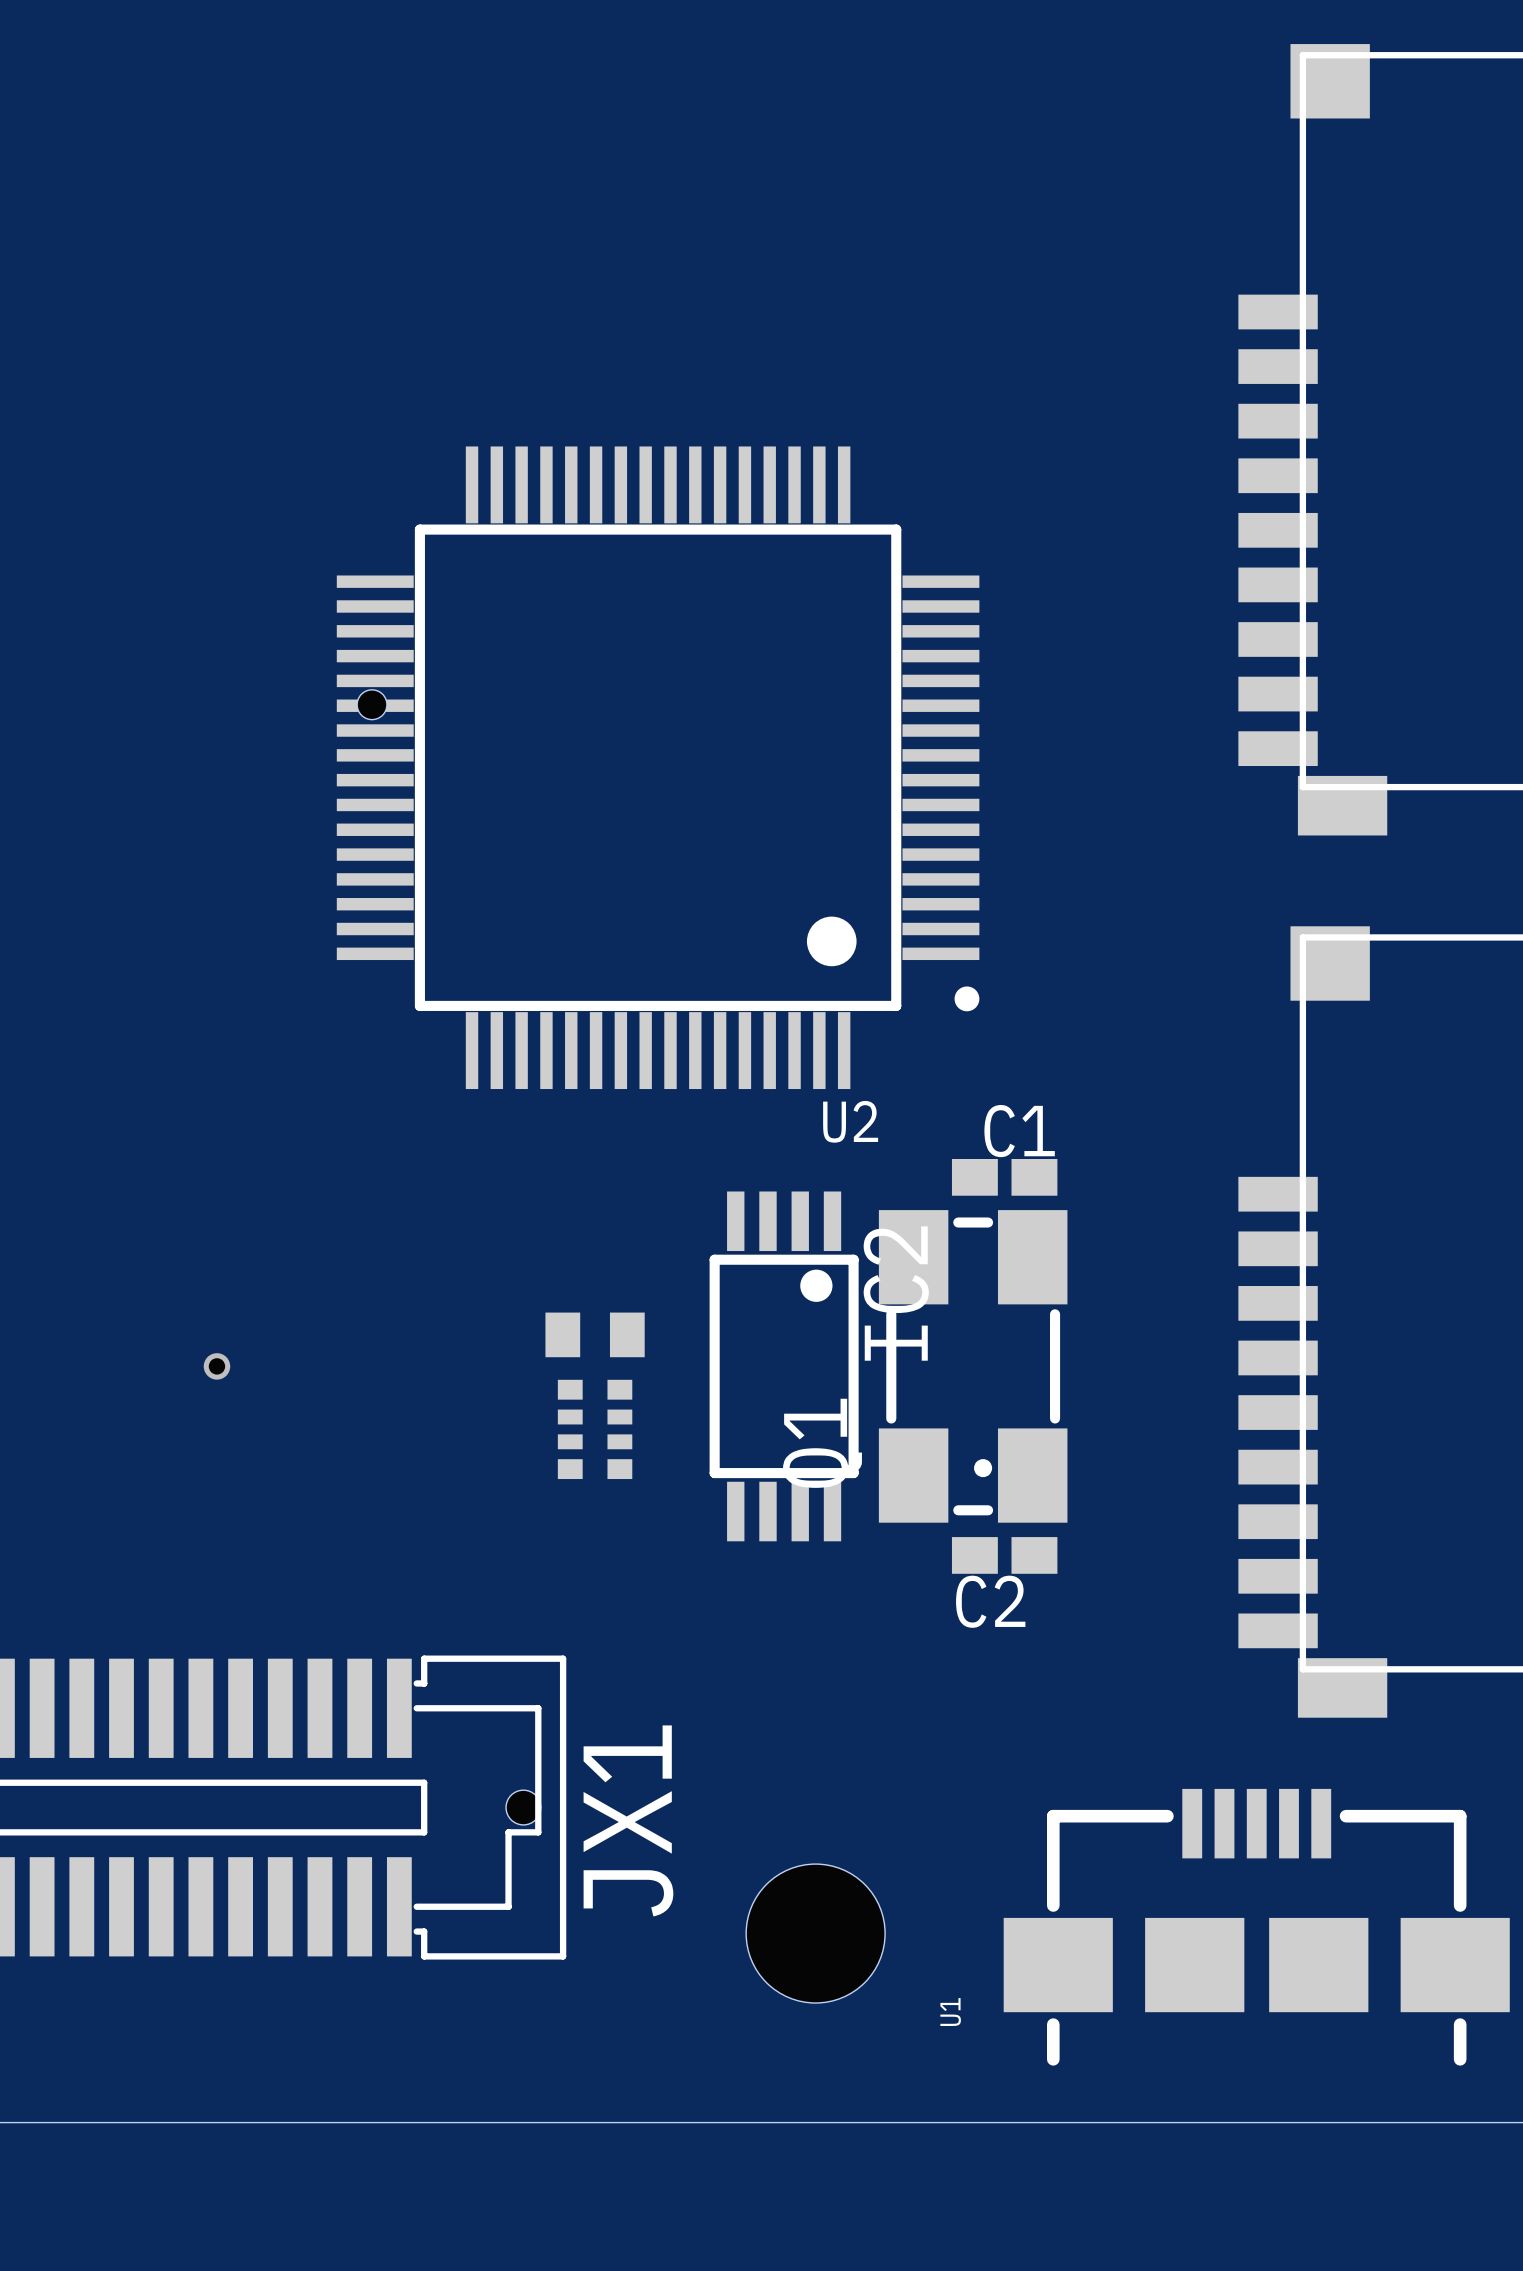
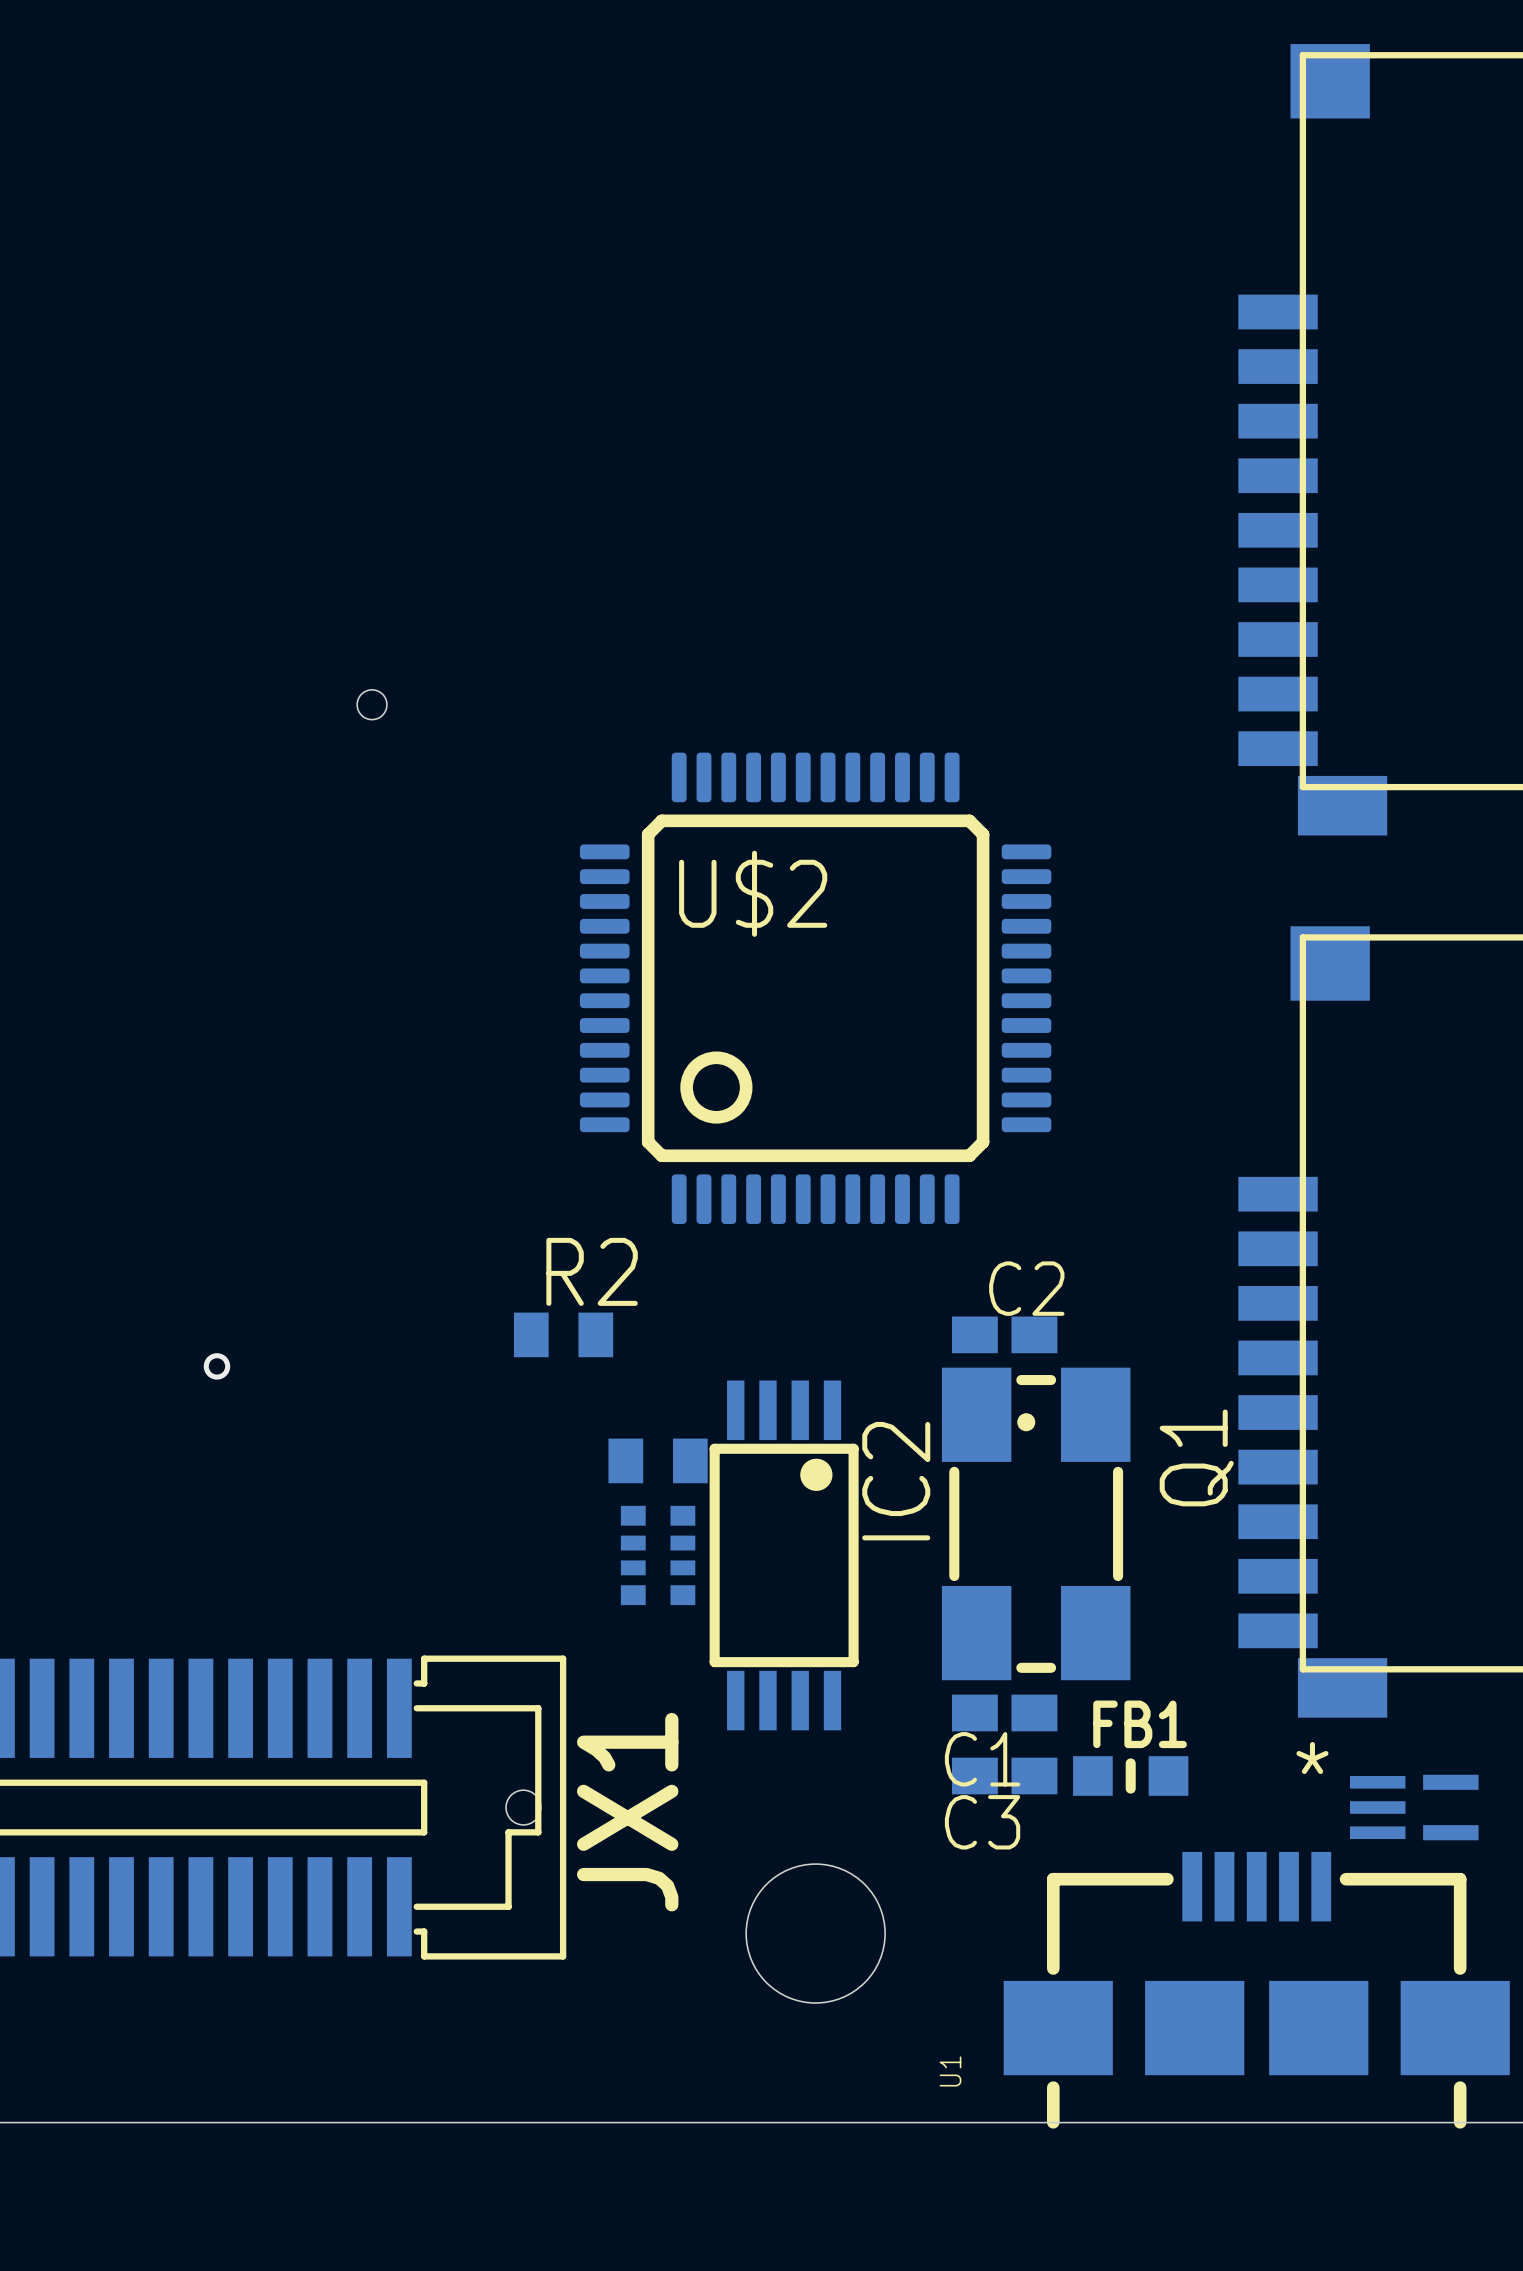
U2: (658, 767) -> none
U$2: none -> (815, 988)
C1 name position: C1 (1019, 1131) -> C1 (982, 1759)
C1 position: (1004, 1177) -> (1004, 1712)
R2 name: none -> R2 (592, 1271)
R2 position: (595, 1334) -> (563, 1334)
IC2 position: (784, 1366) -> (784, 1555)
Q1 rotation: 0° (973, 1366) -> 180° (1036, 1523)
part position: (595, 1429) -> (658, 1555)
part: none -> (658, 1460)
C2 position: (1004, 1555) -> (1004, 1334)
C2 name position: C2 (990, 1601) -> C2 (1026, 1288)
C3: none -> (1004, 1776)
FB1: none -> (1130, 1776)
part: none -> (1414, 1807)
U1 position: (1256, 1927) -> (1256, 1990)

